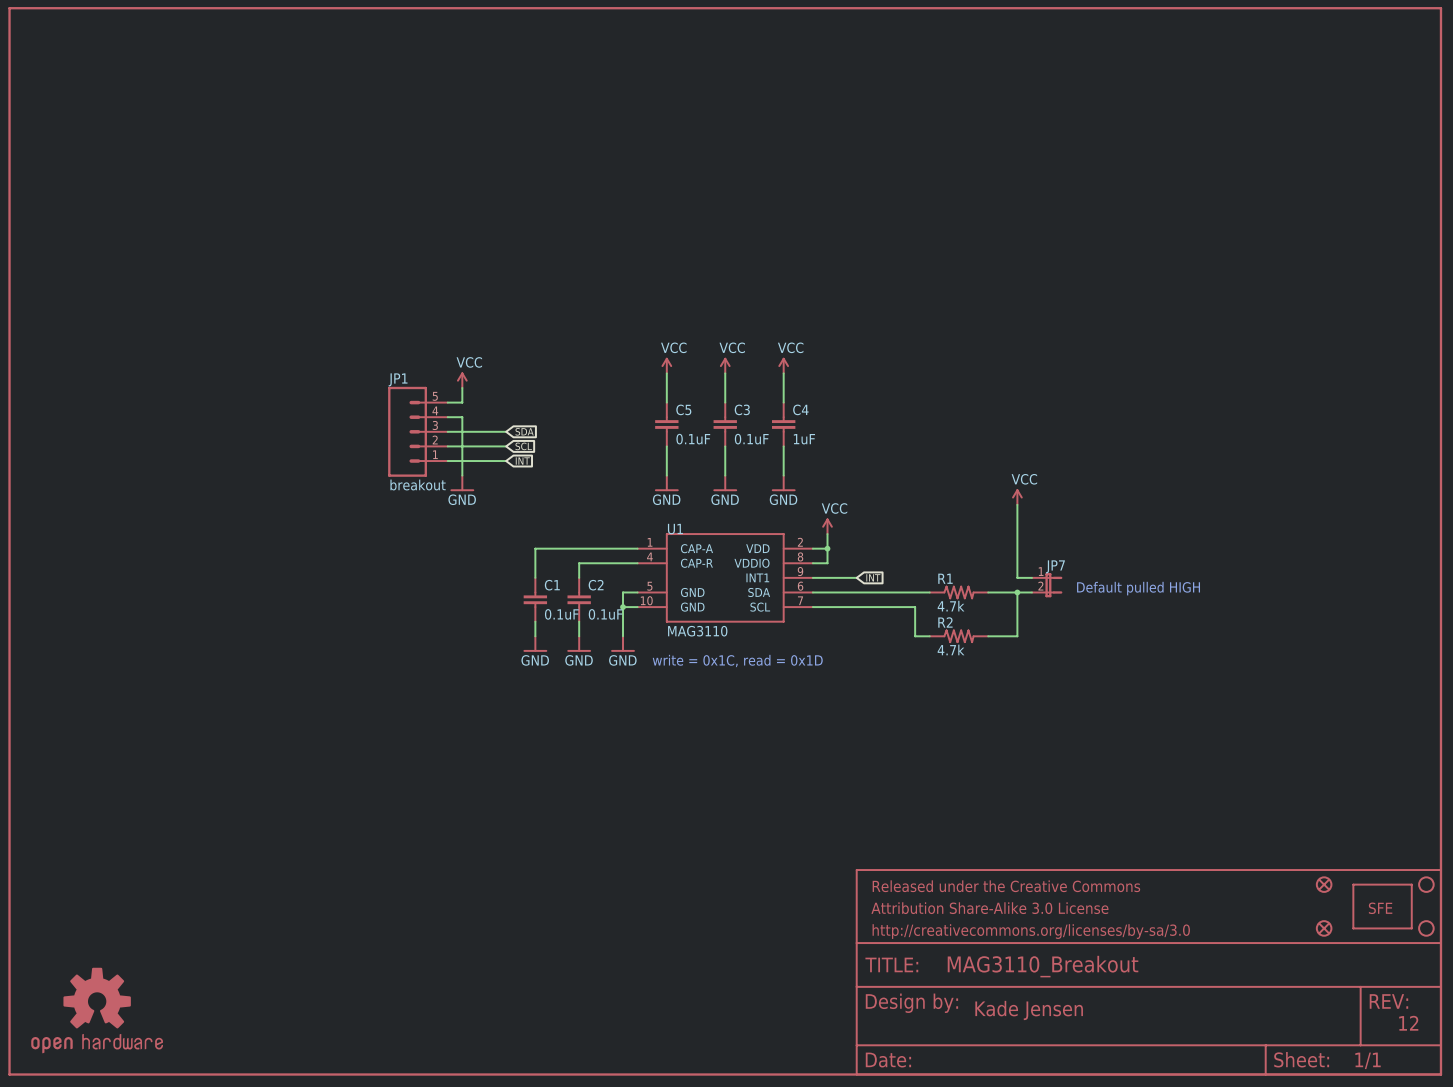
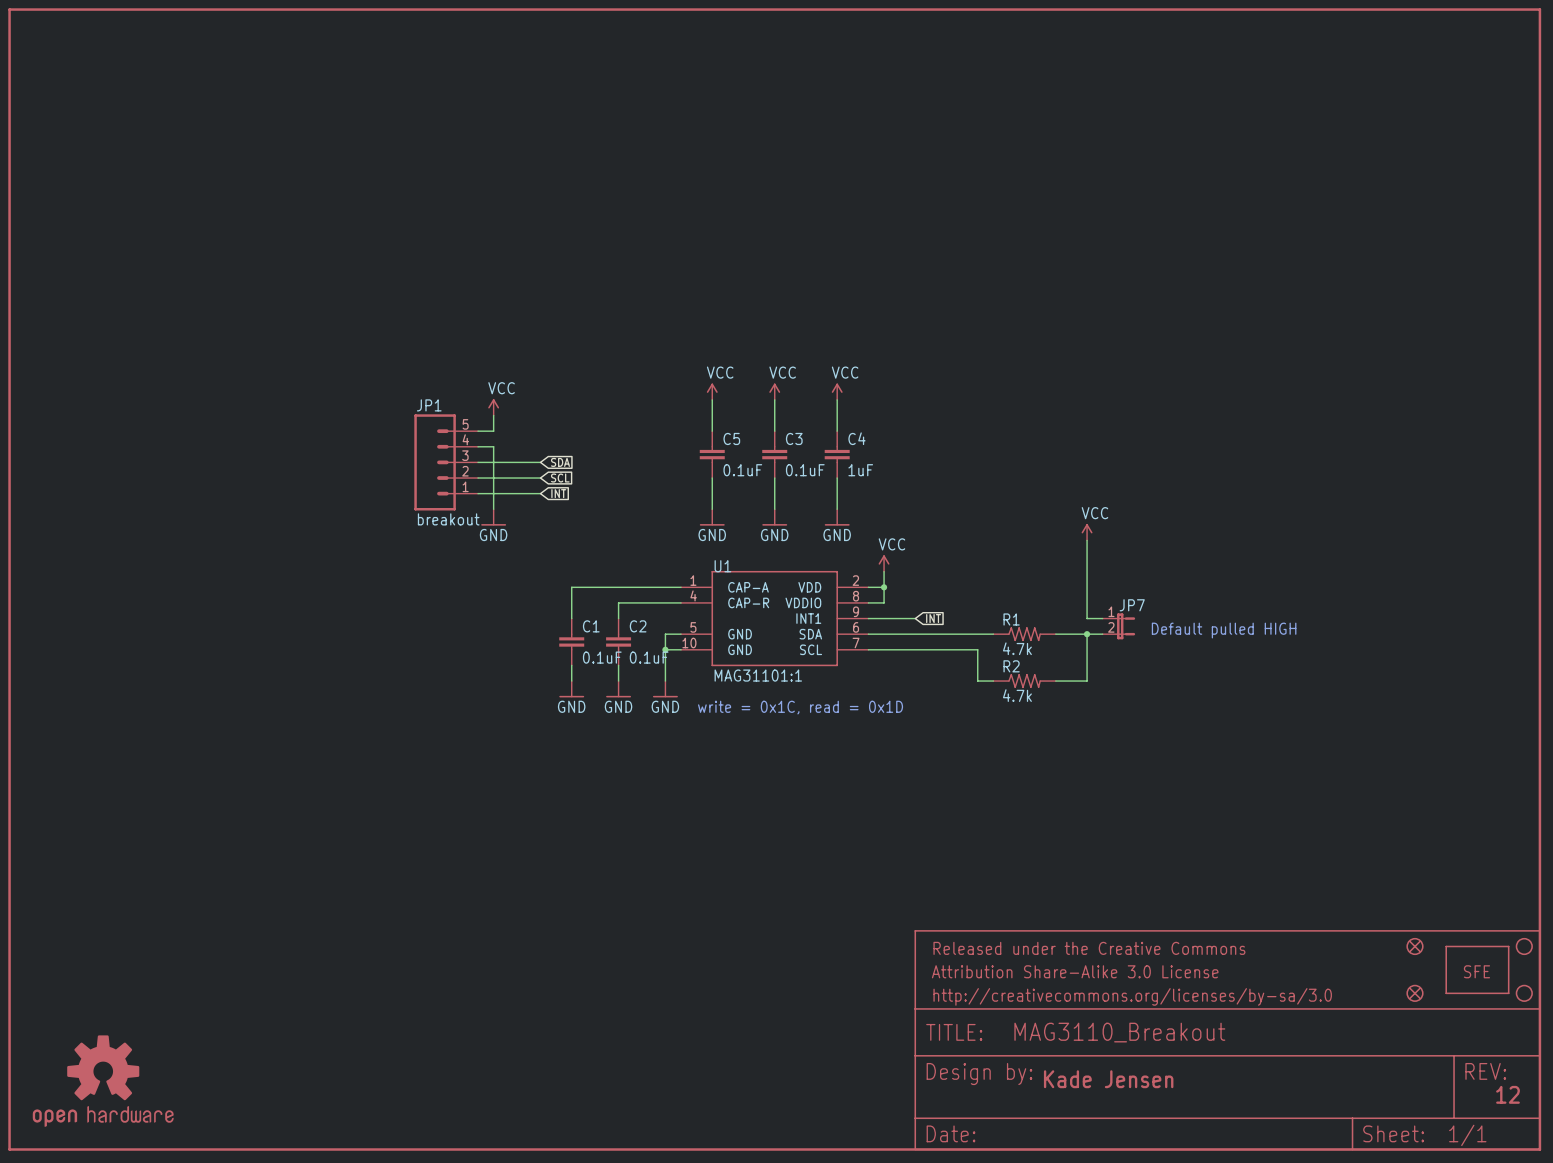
U1 value: MAG3110 (697, 631) -> MAG31101:1 (758, 675)

